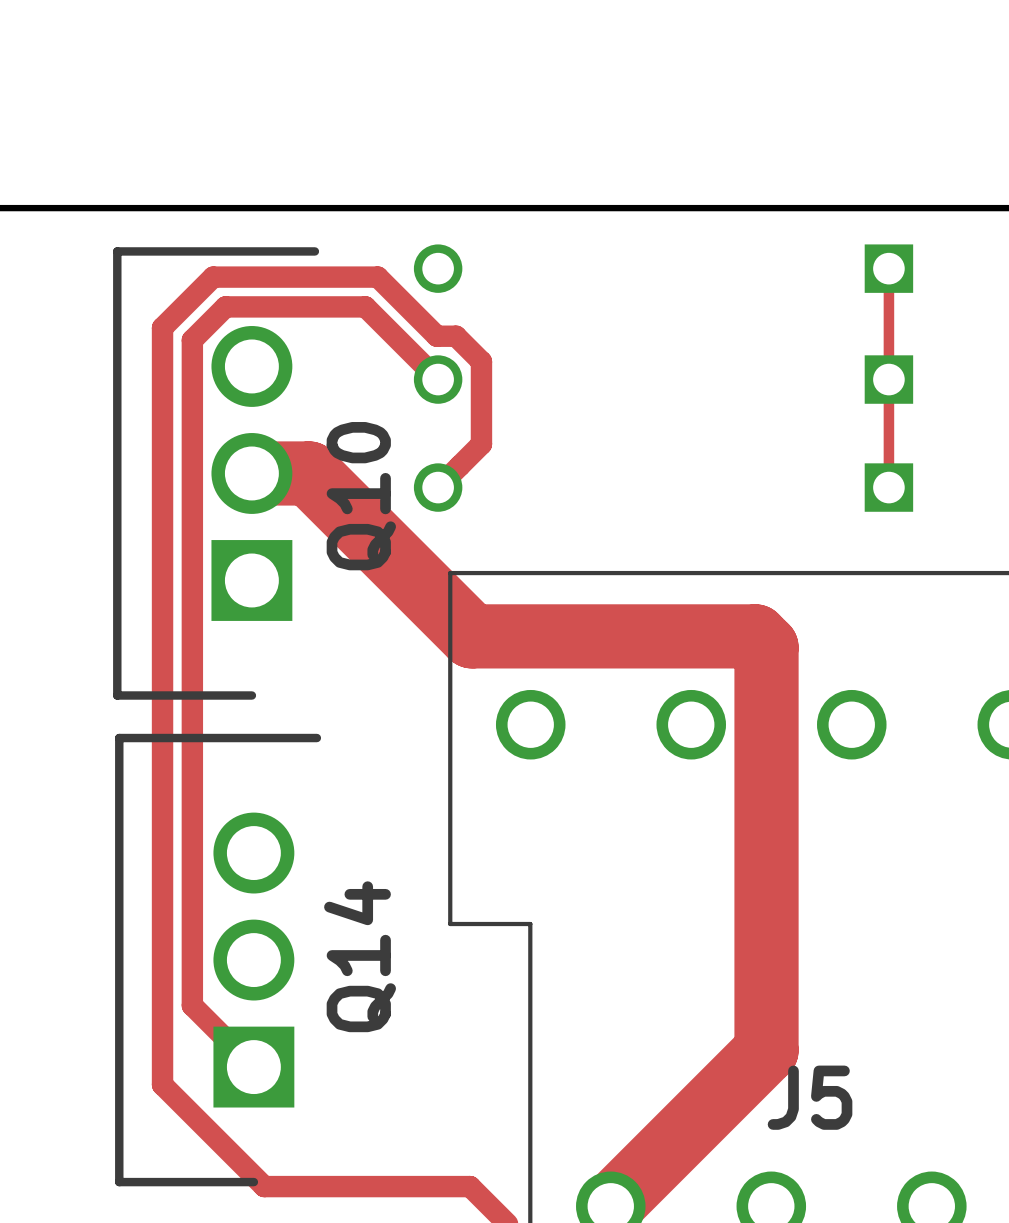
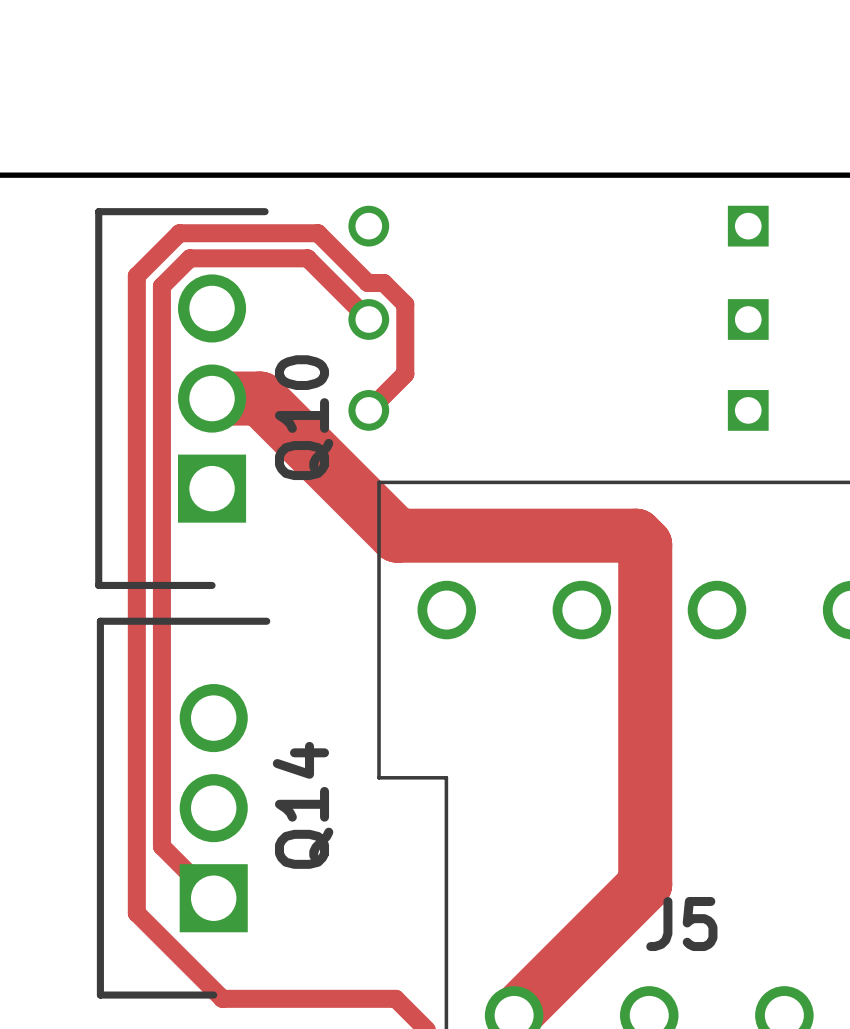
track: (888, 268) (888, 487) -> none

